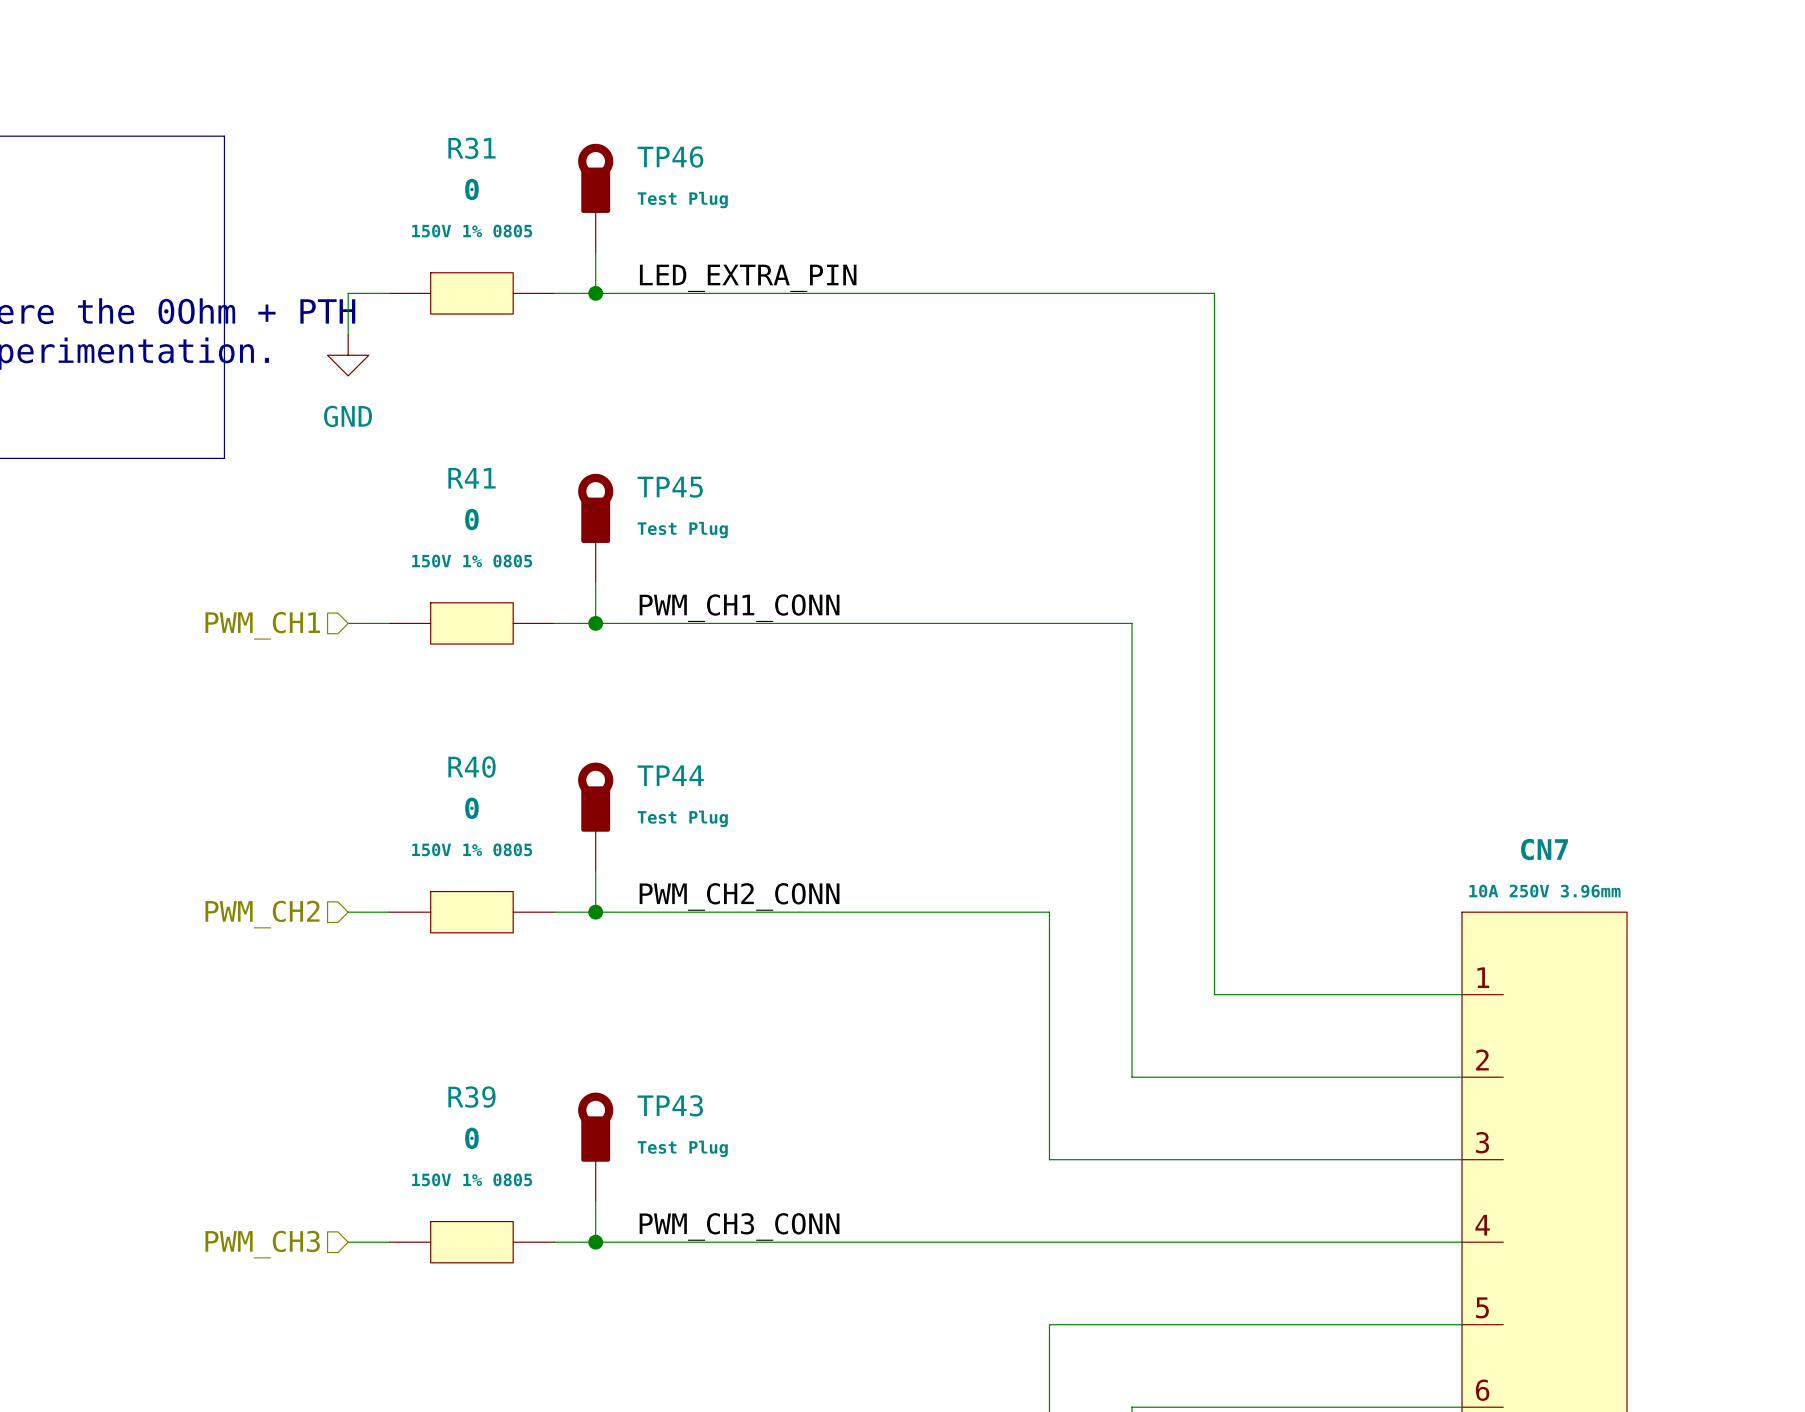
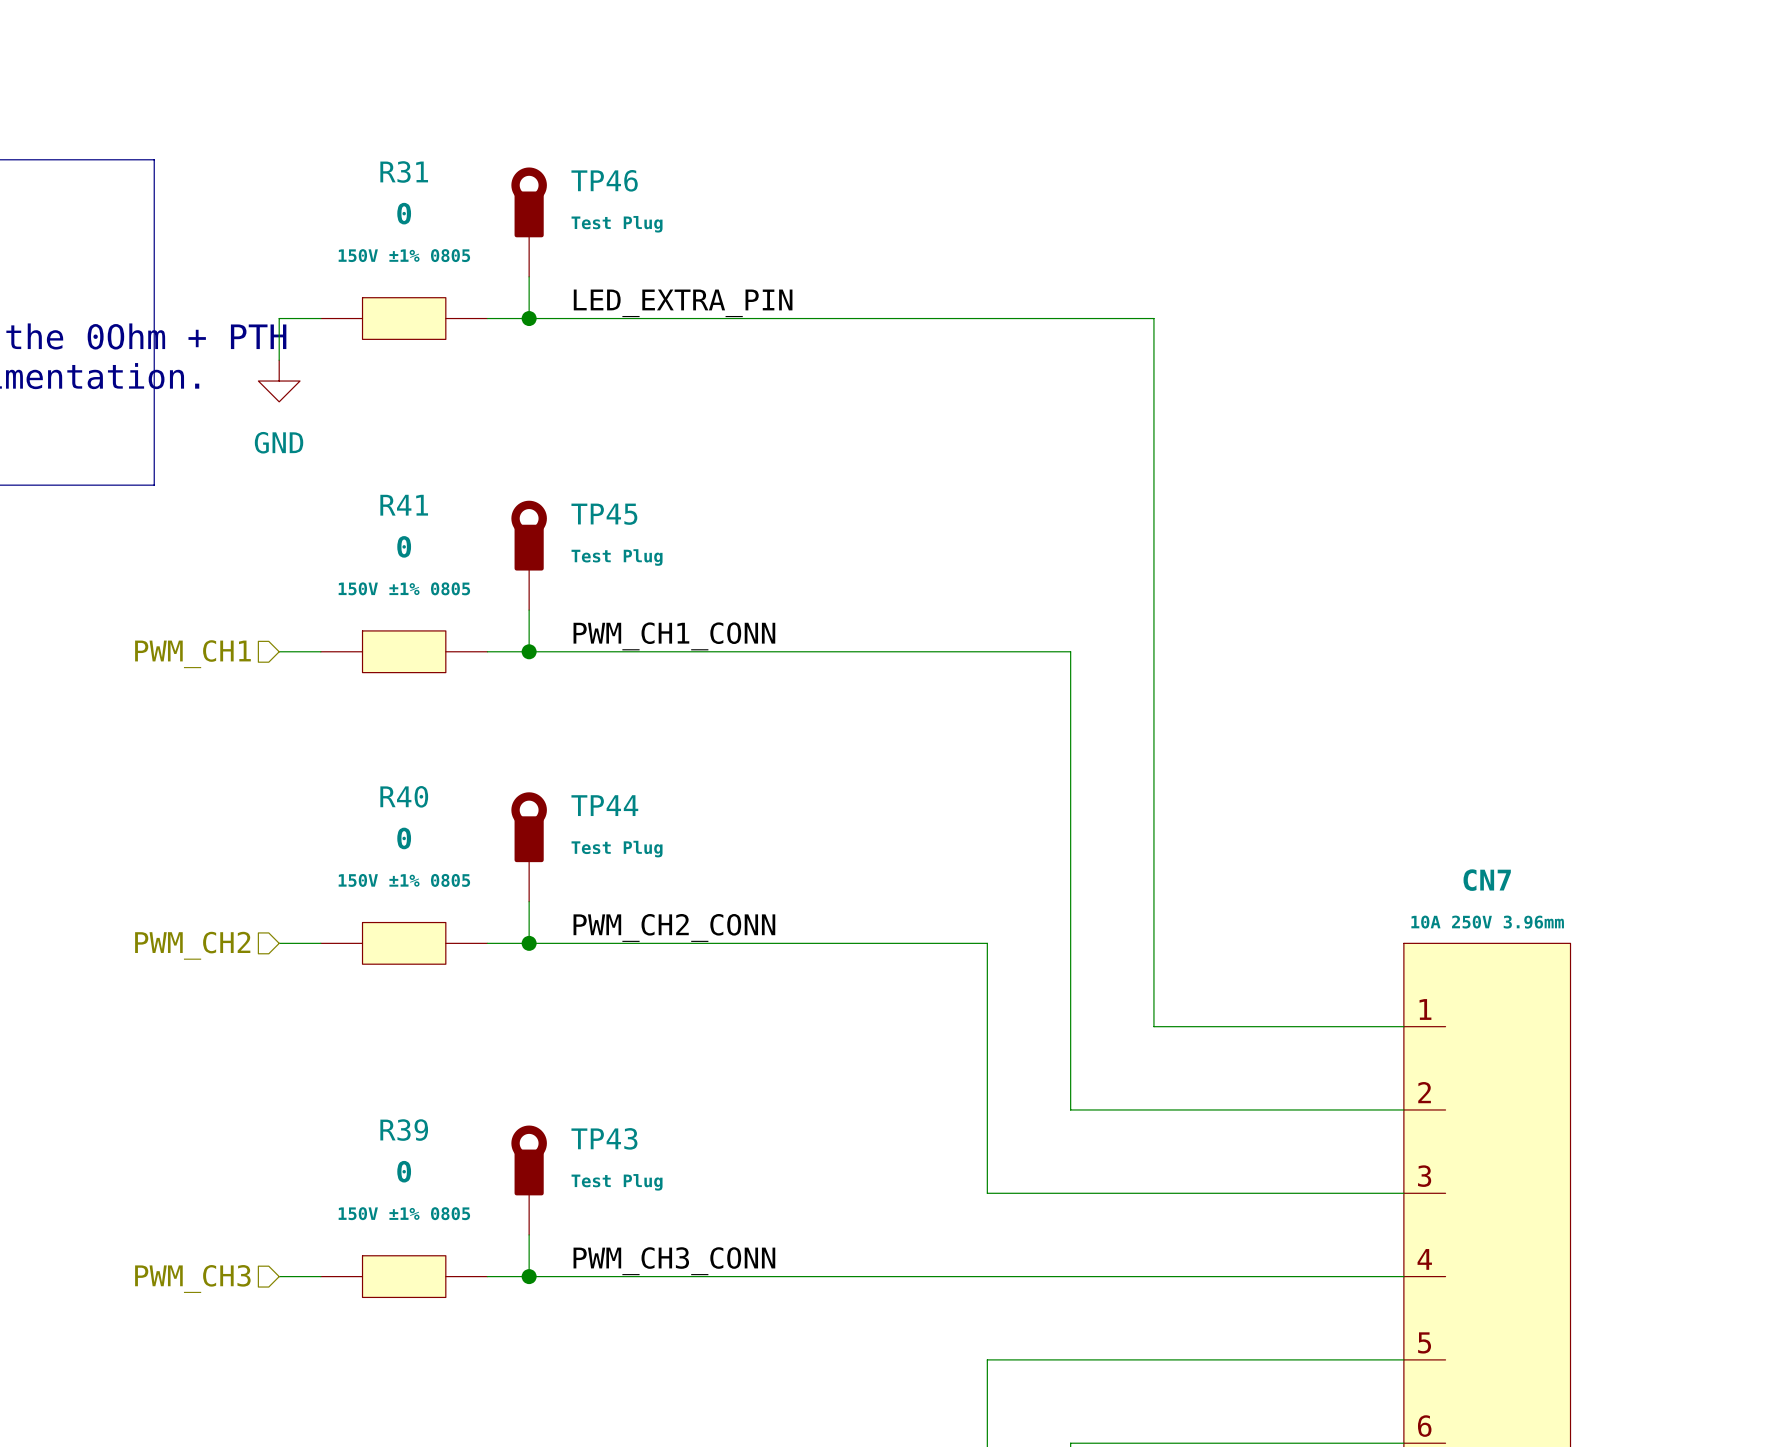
R31 text: 150V 1% 0805 (472, 231) -> 150V ±1% 0805 (404, 255)
R41 text: 150V 1% 0805 (472, 561) -> 150V ±1% 0805 (404, 588)
R40 text: 150V 1% 0805 (472, 849) -> 150V ±1% 0805 (404, 880)
R39 text: 150V 1% 0805 (472, 1179) -> 150V ±1% 0805 (404, 1213)

